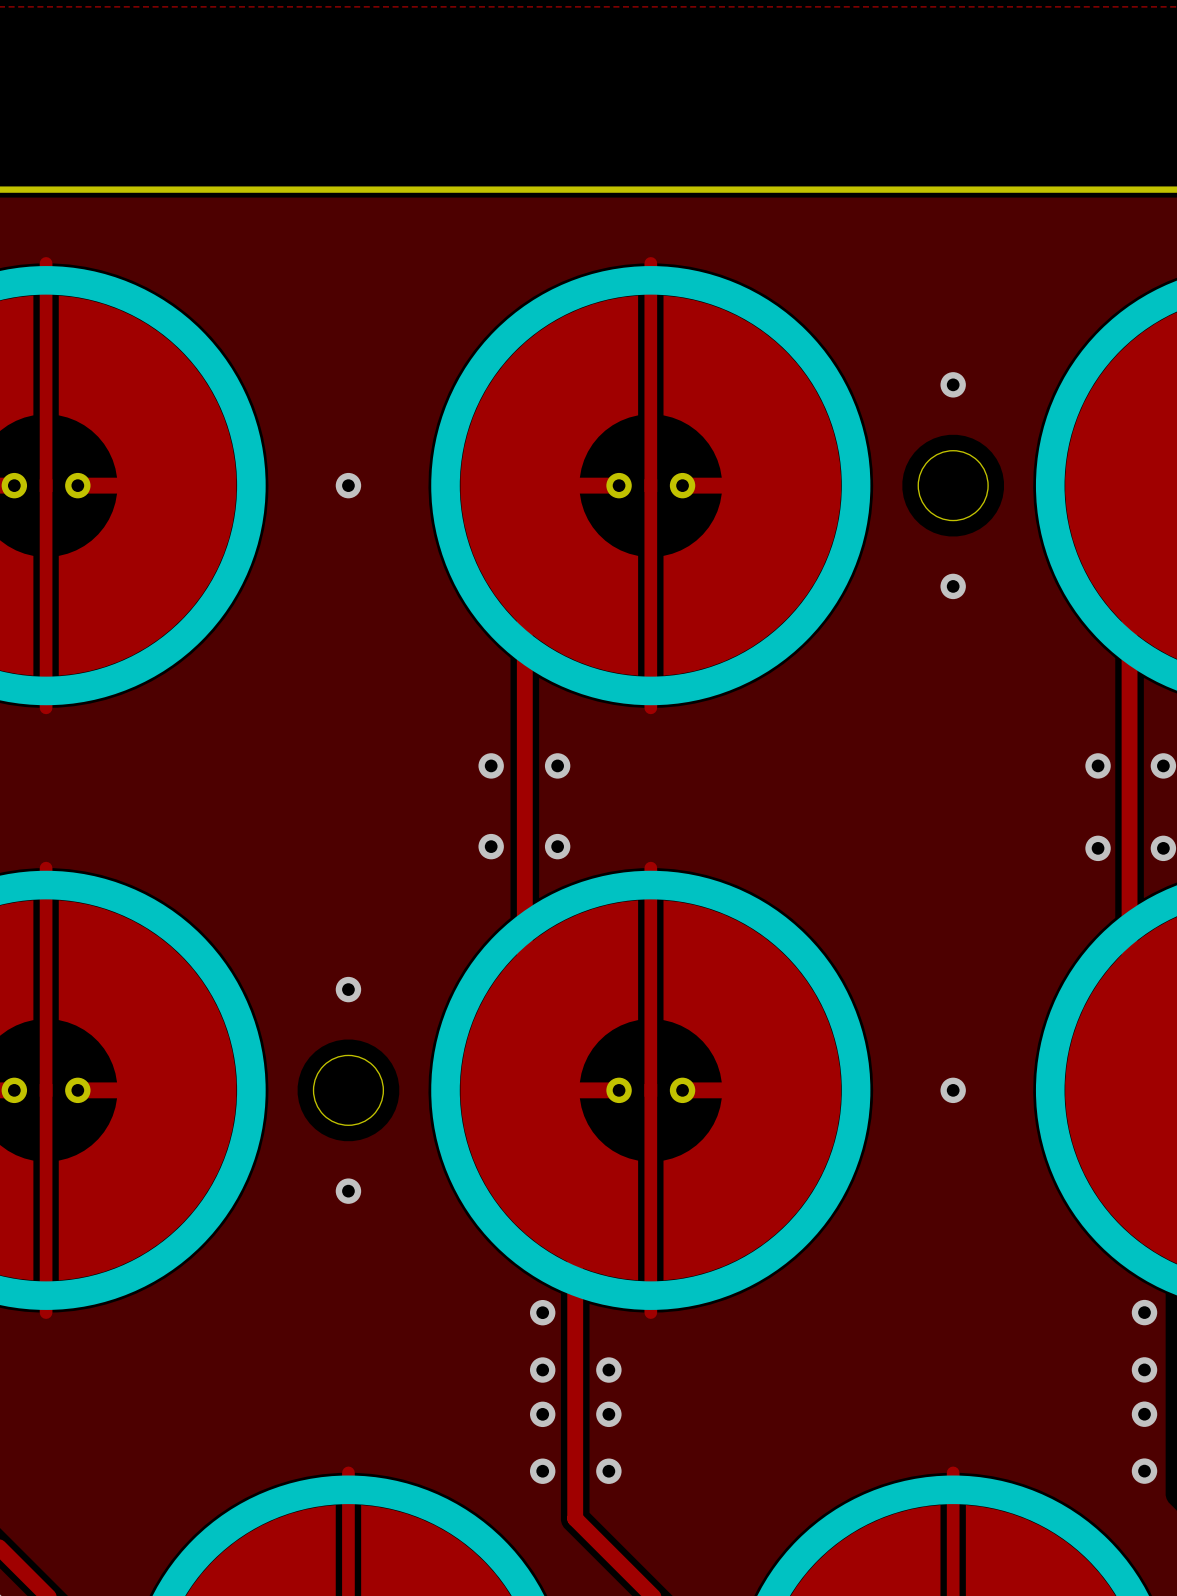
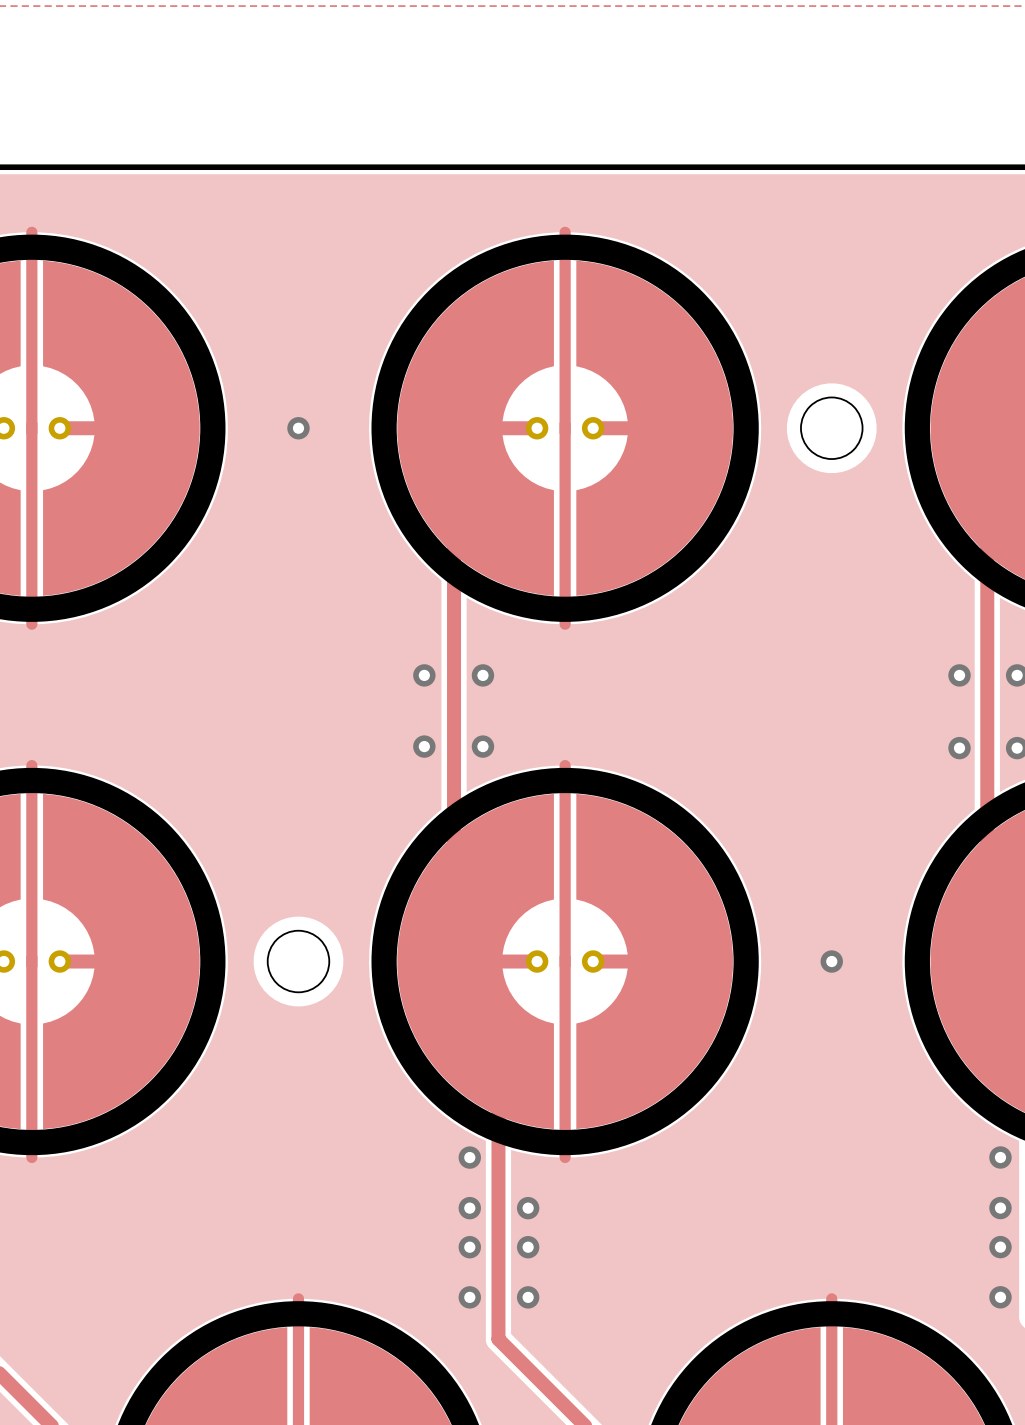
via: (953, 384) -> none
via: (953, 586) -> none
via: (348, 989) -> none
via: (348, 1191) -> none

